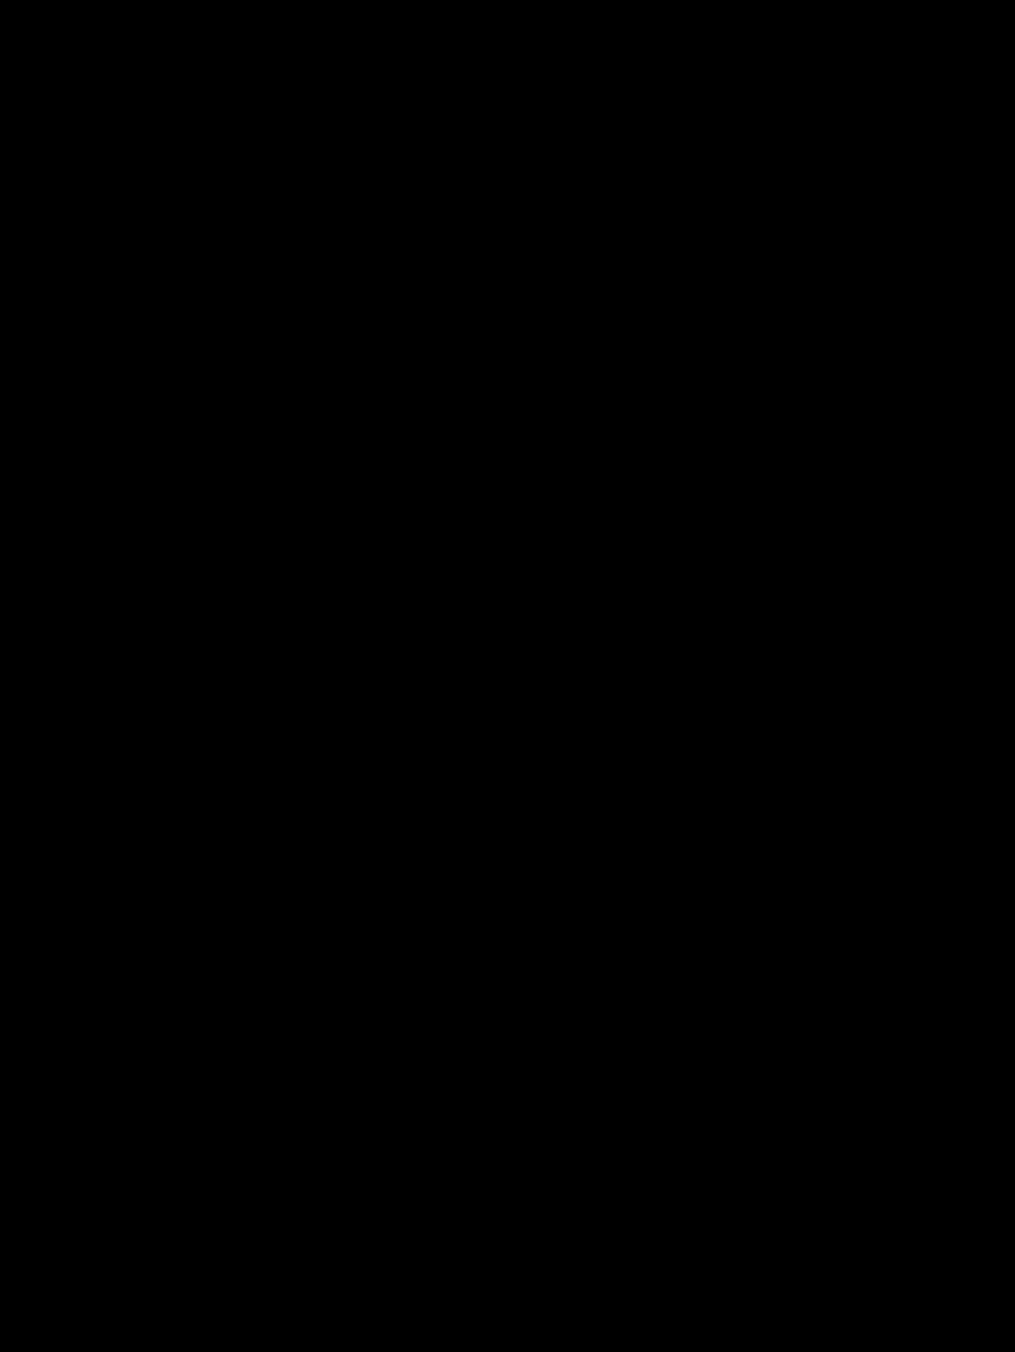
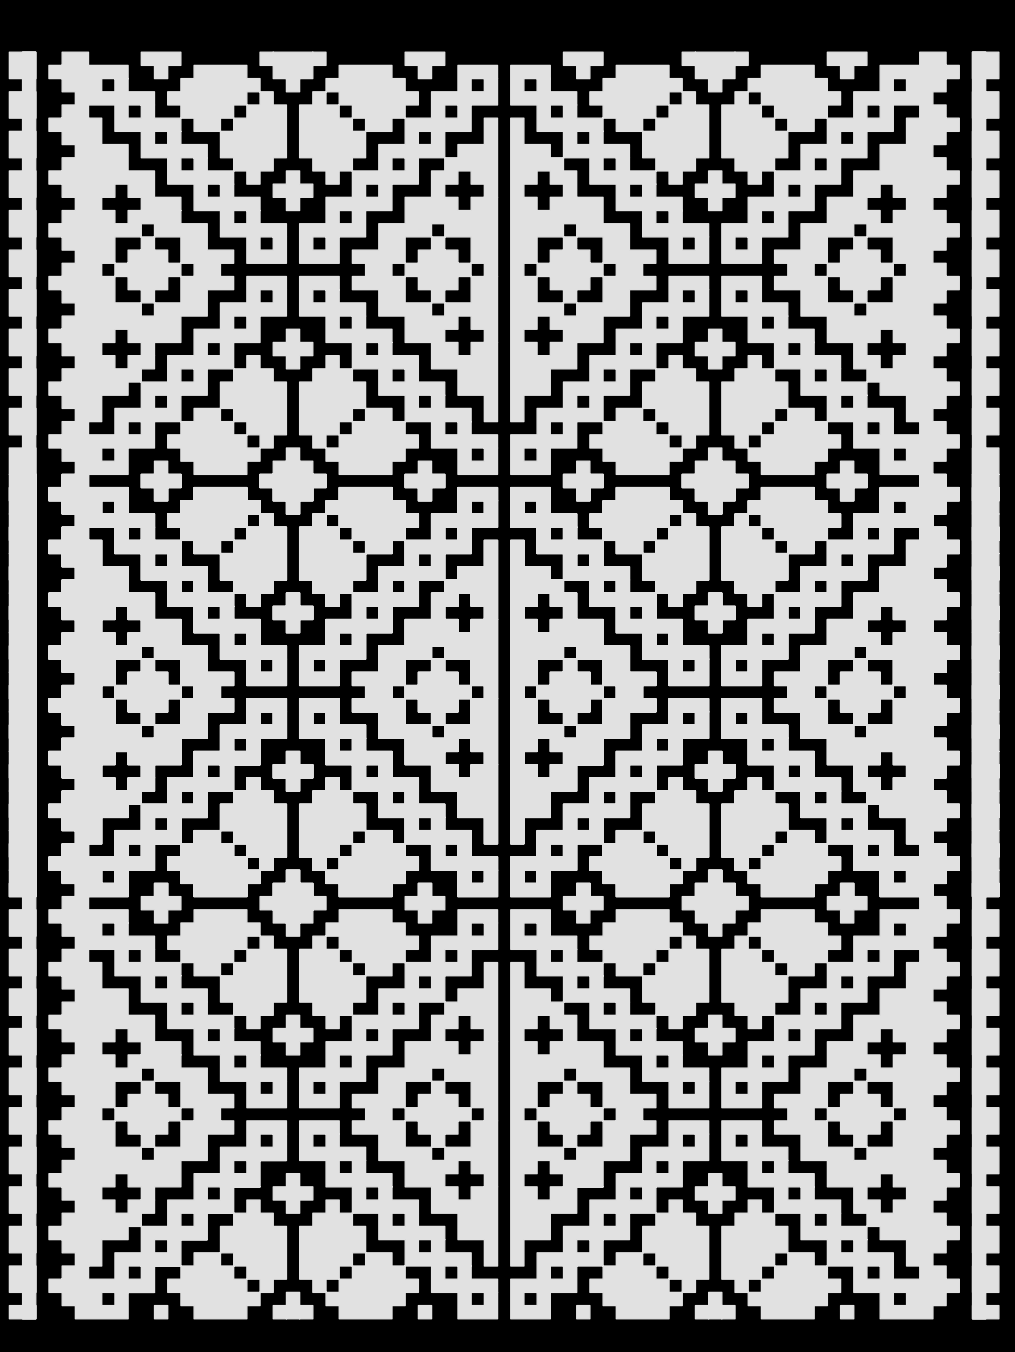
drawing: none -> [8, 51, 1000, 1320]

